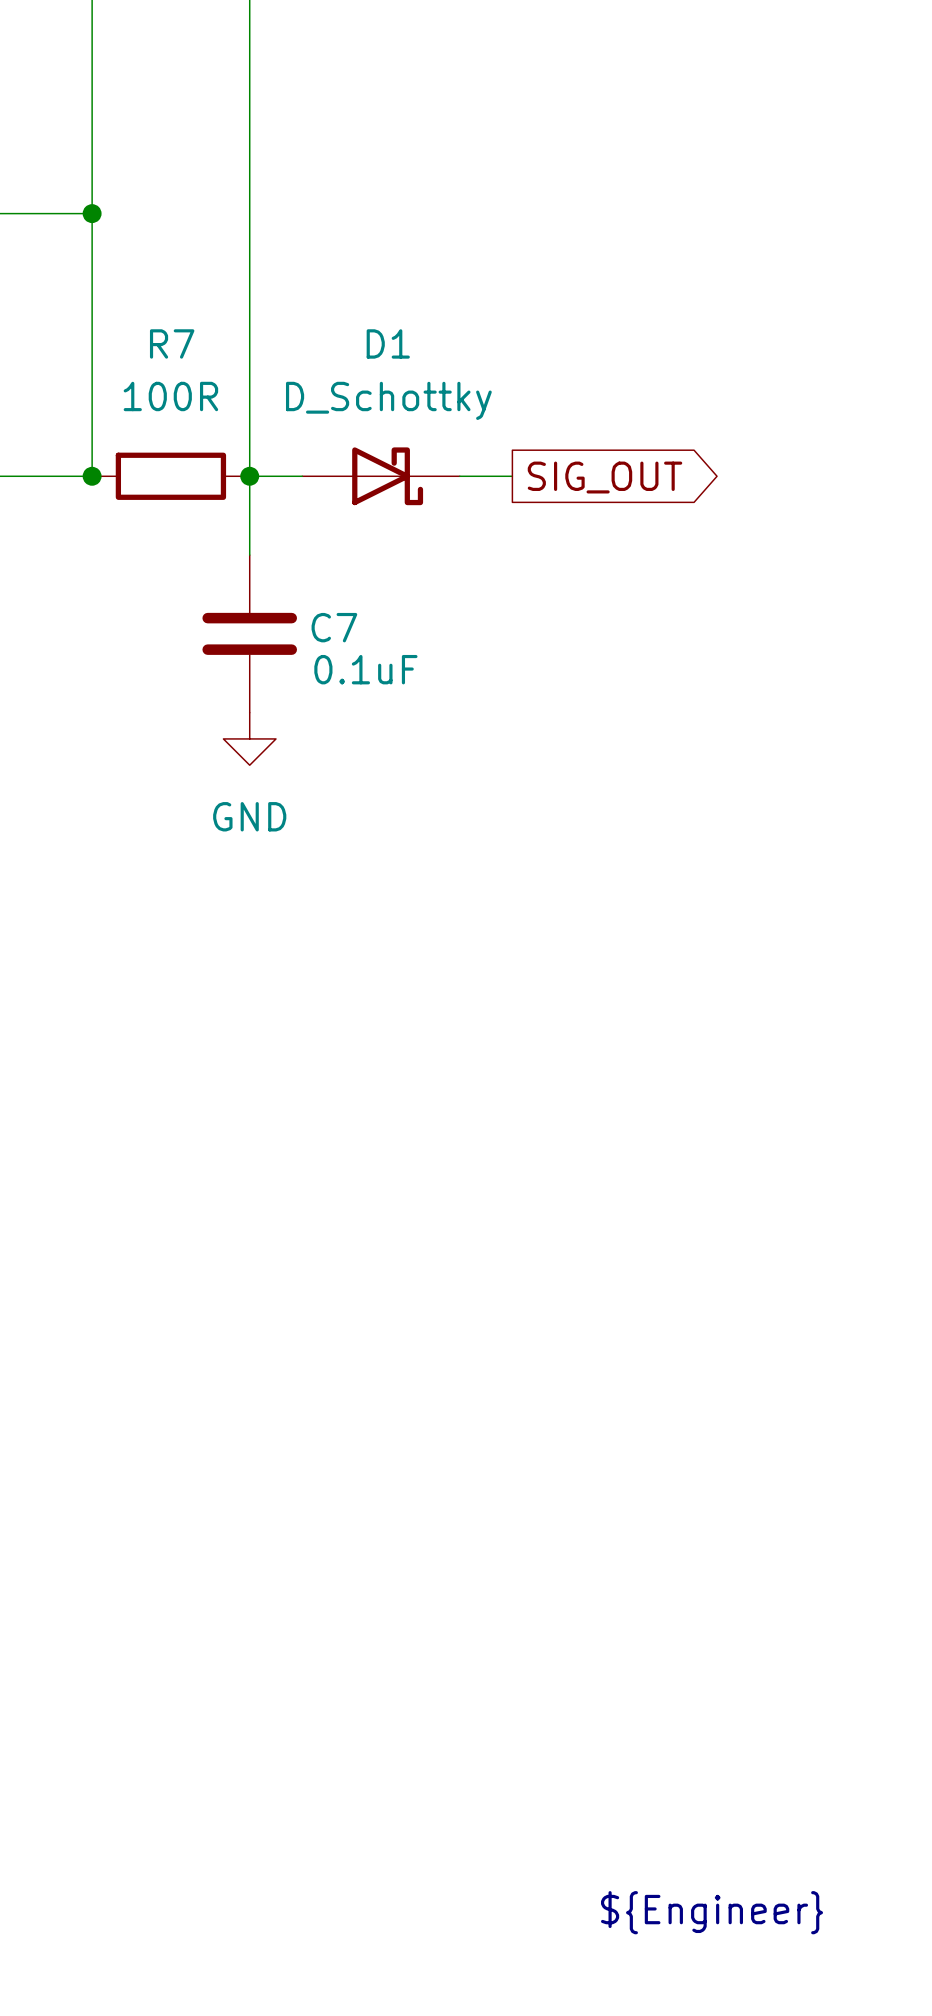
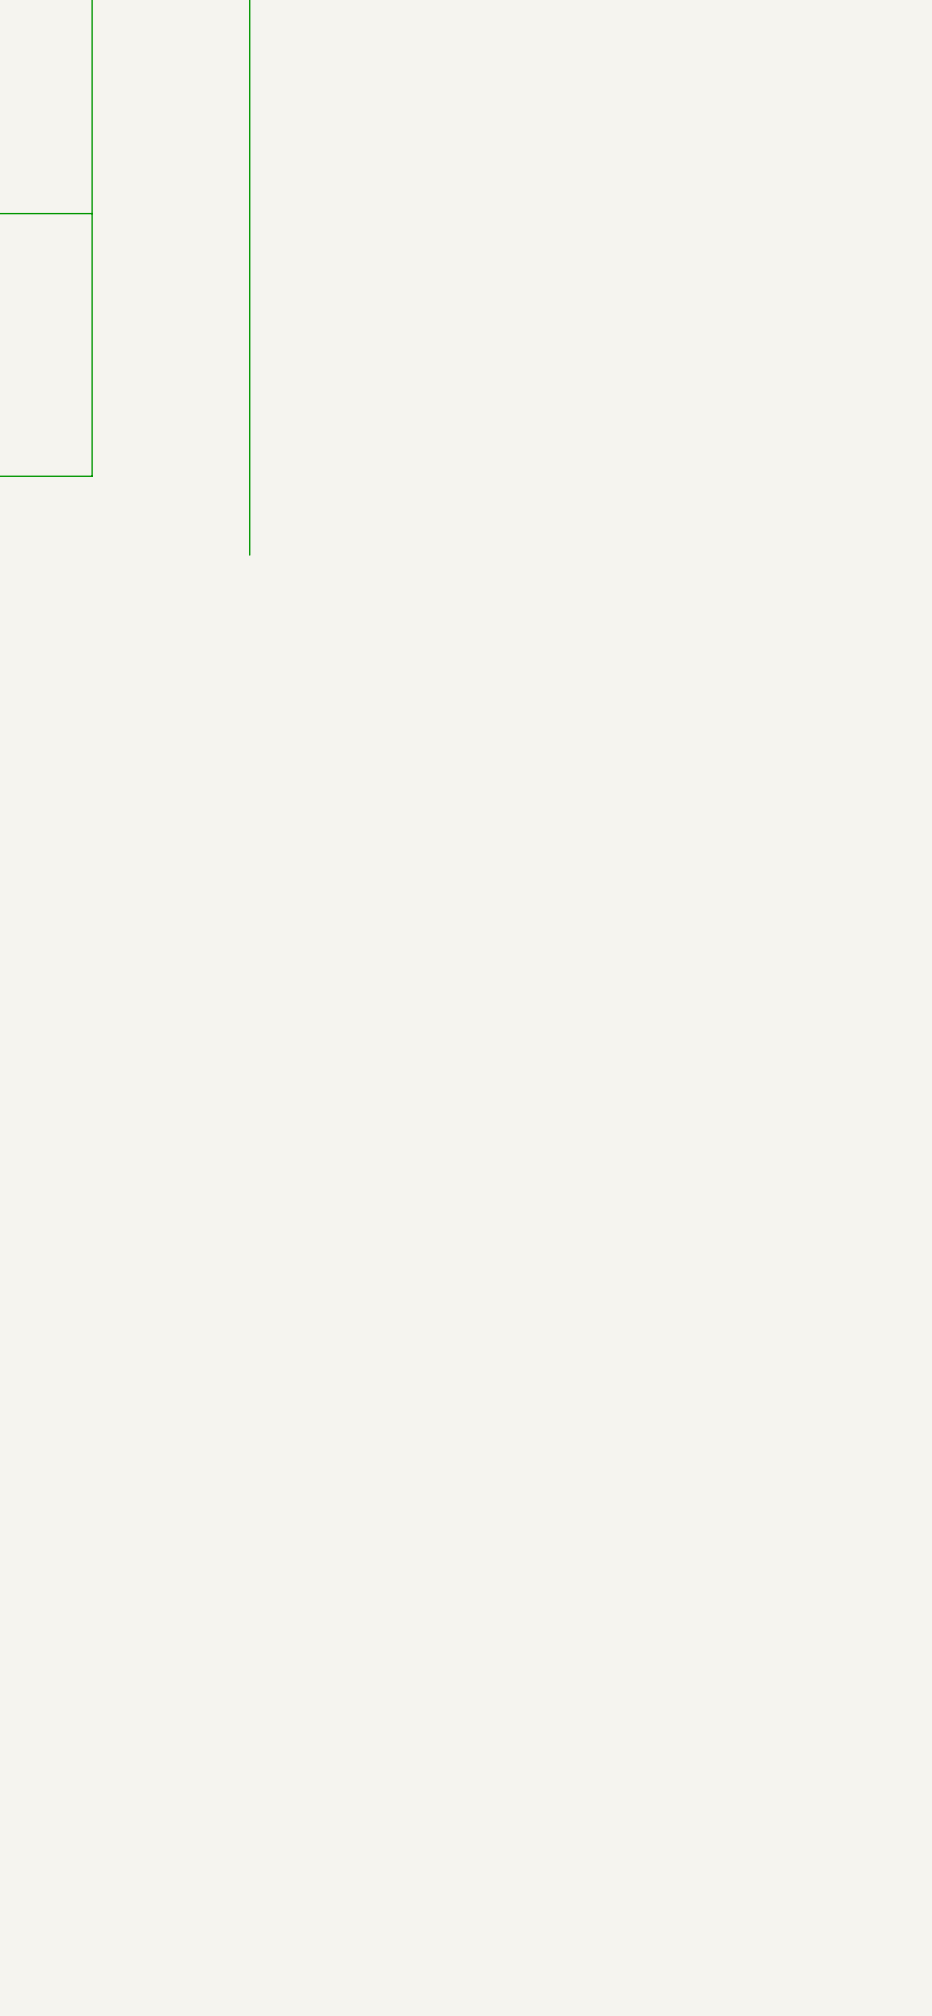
junction: (92, 213) -> none
junction: (92, 476) -> none
R7: 100R (170, 476) -> none
wire: (249, 476) (302, 476) -> none
junction: (249, 476) -> none
D1: D_Schottky (381, 476) -> none
wire: (459, 476) (512, 476) -> none
global label: SIG_OUT (604, 477) -> none
C7: 0.1uF (249, 633) -> none
power symbol: GND (249, 738) -> none
text: ${Engineer} (712, 1912) -> none

